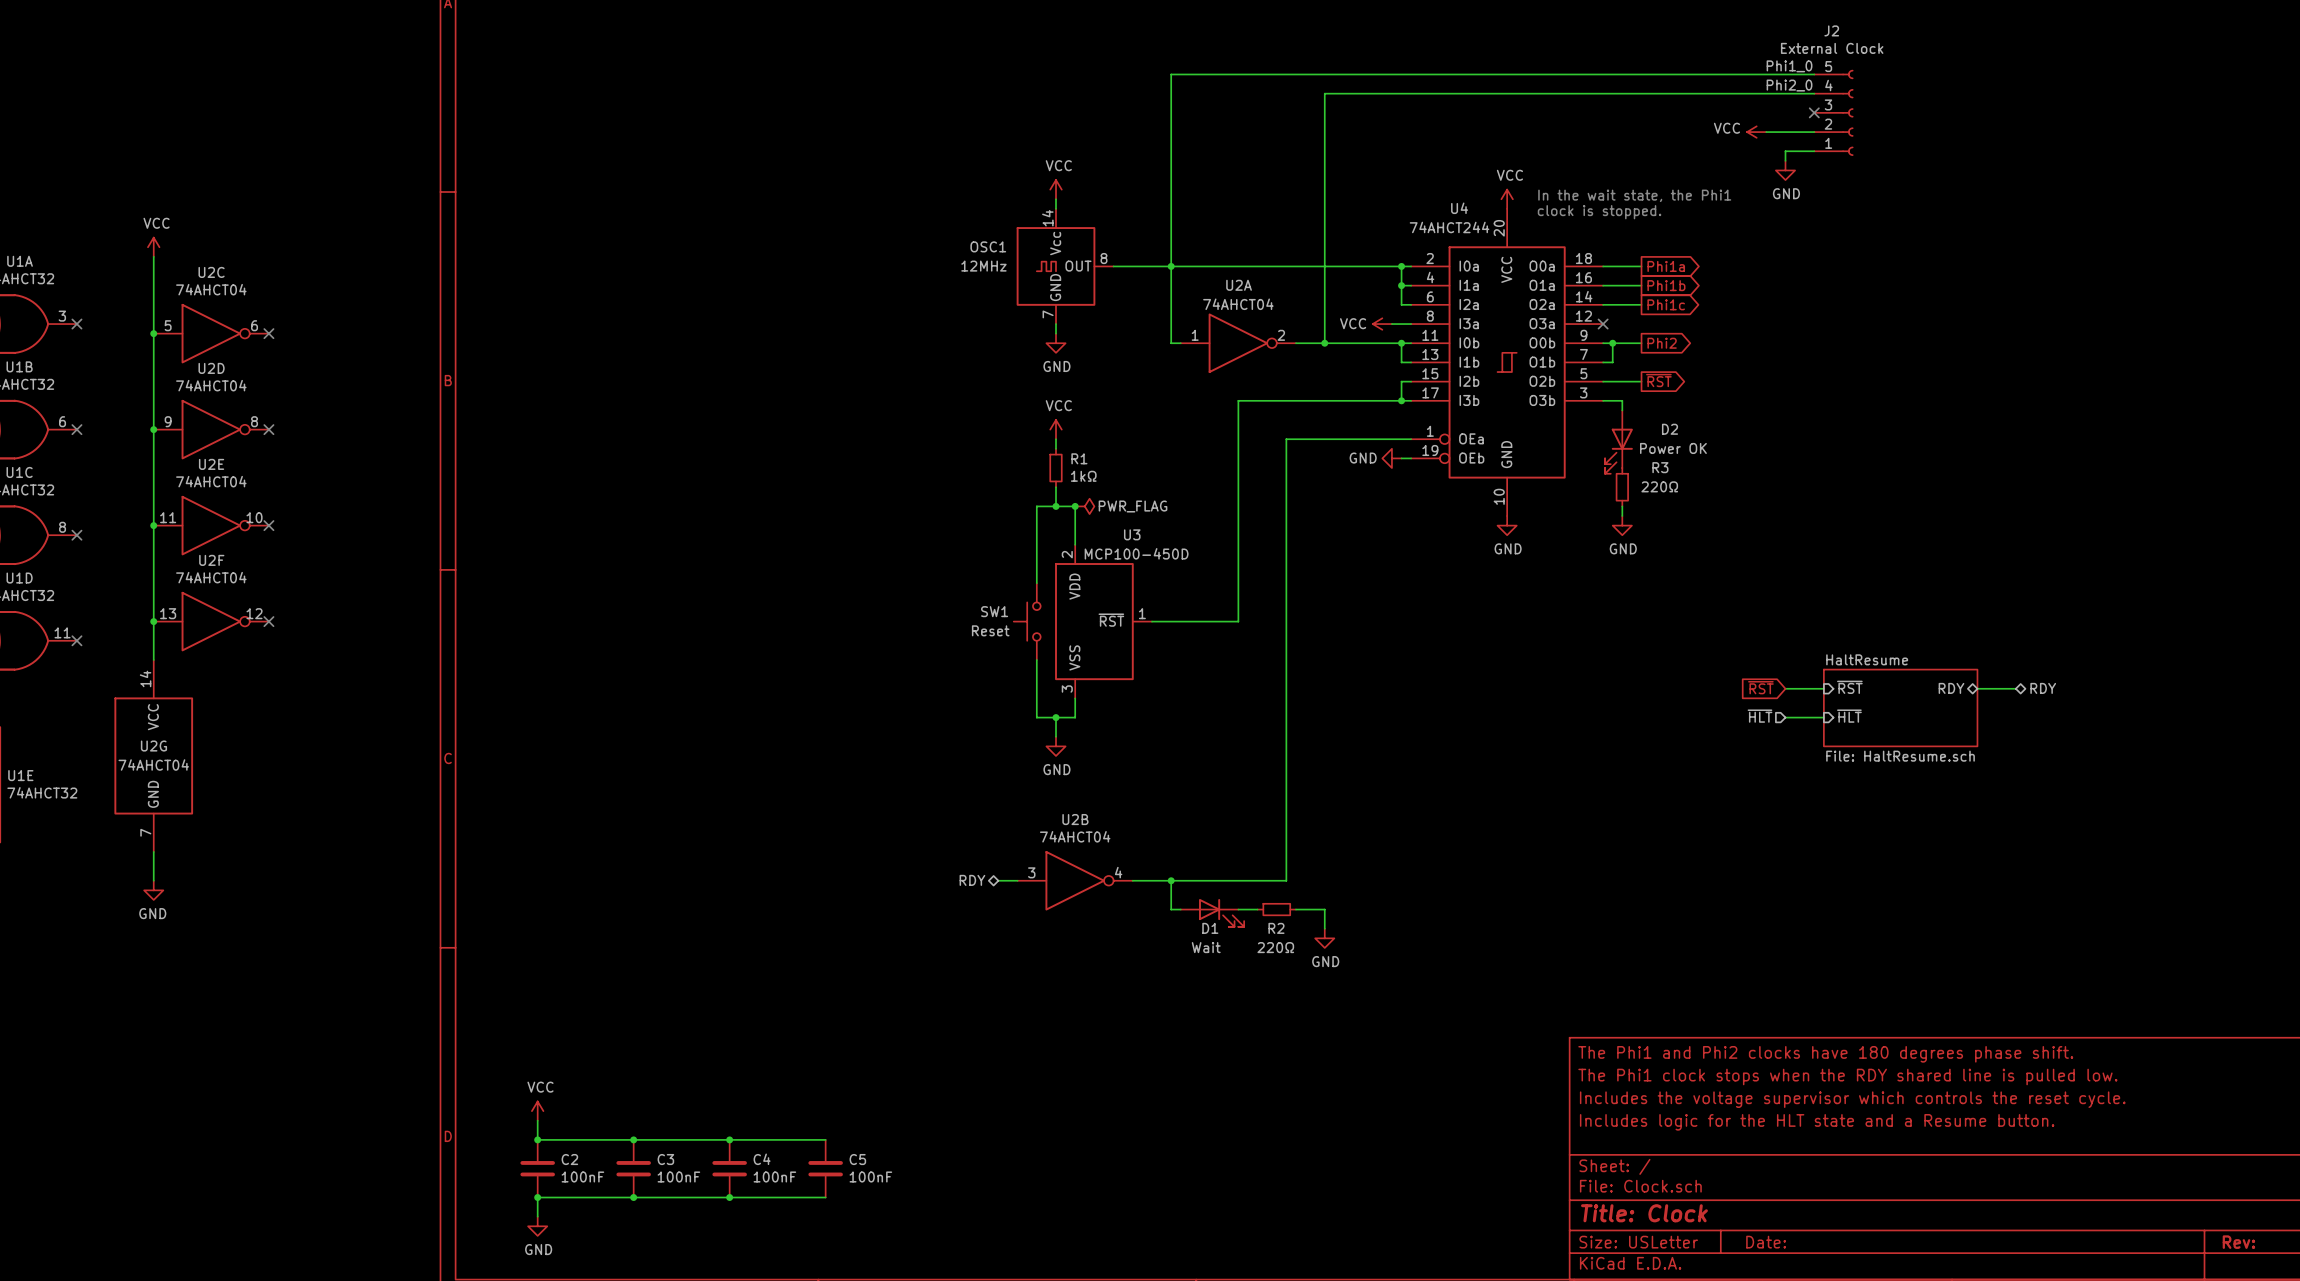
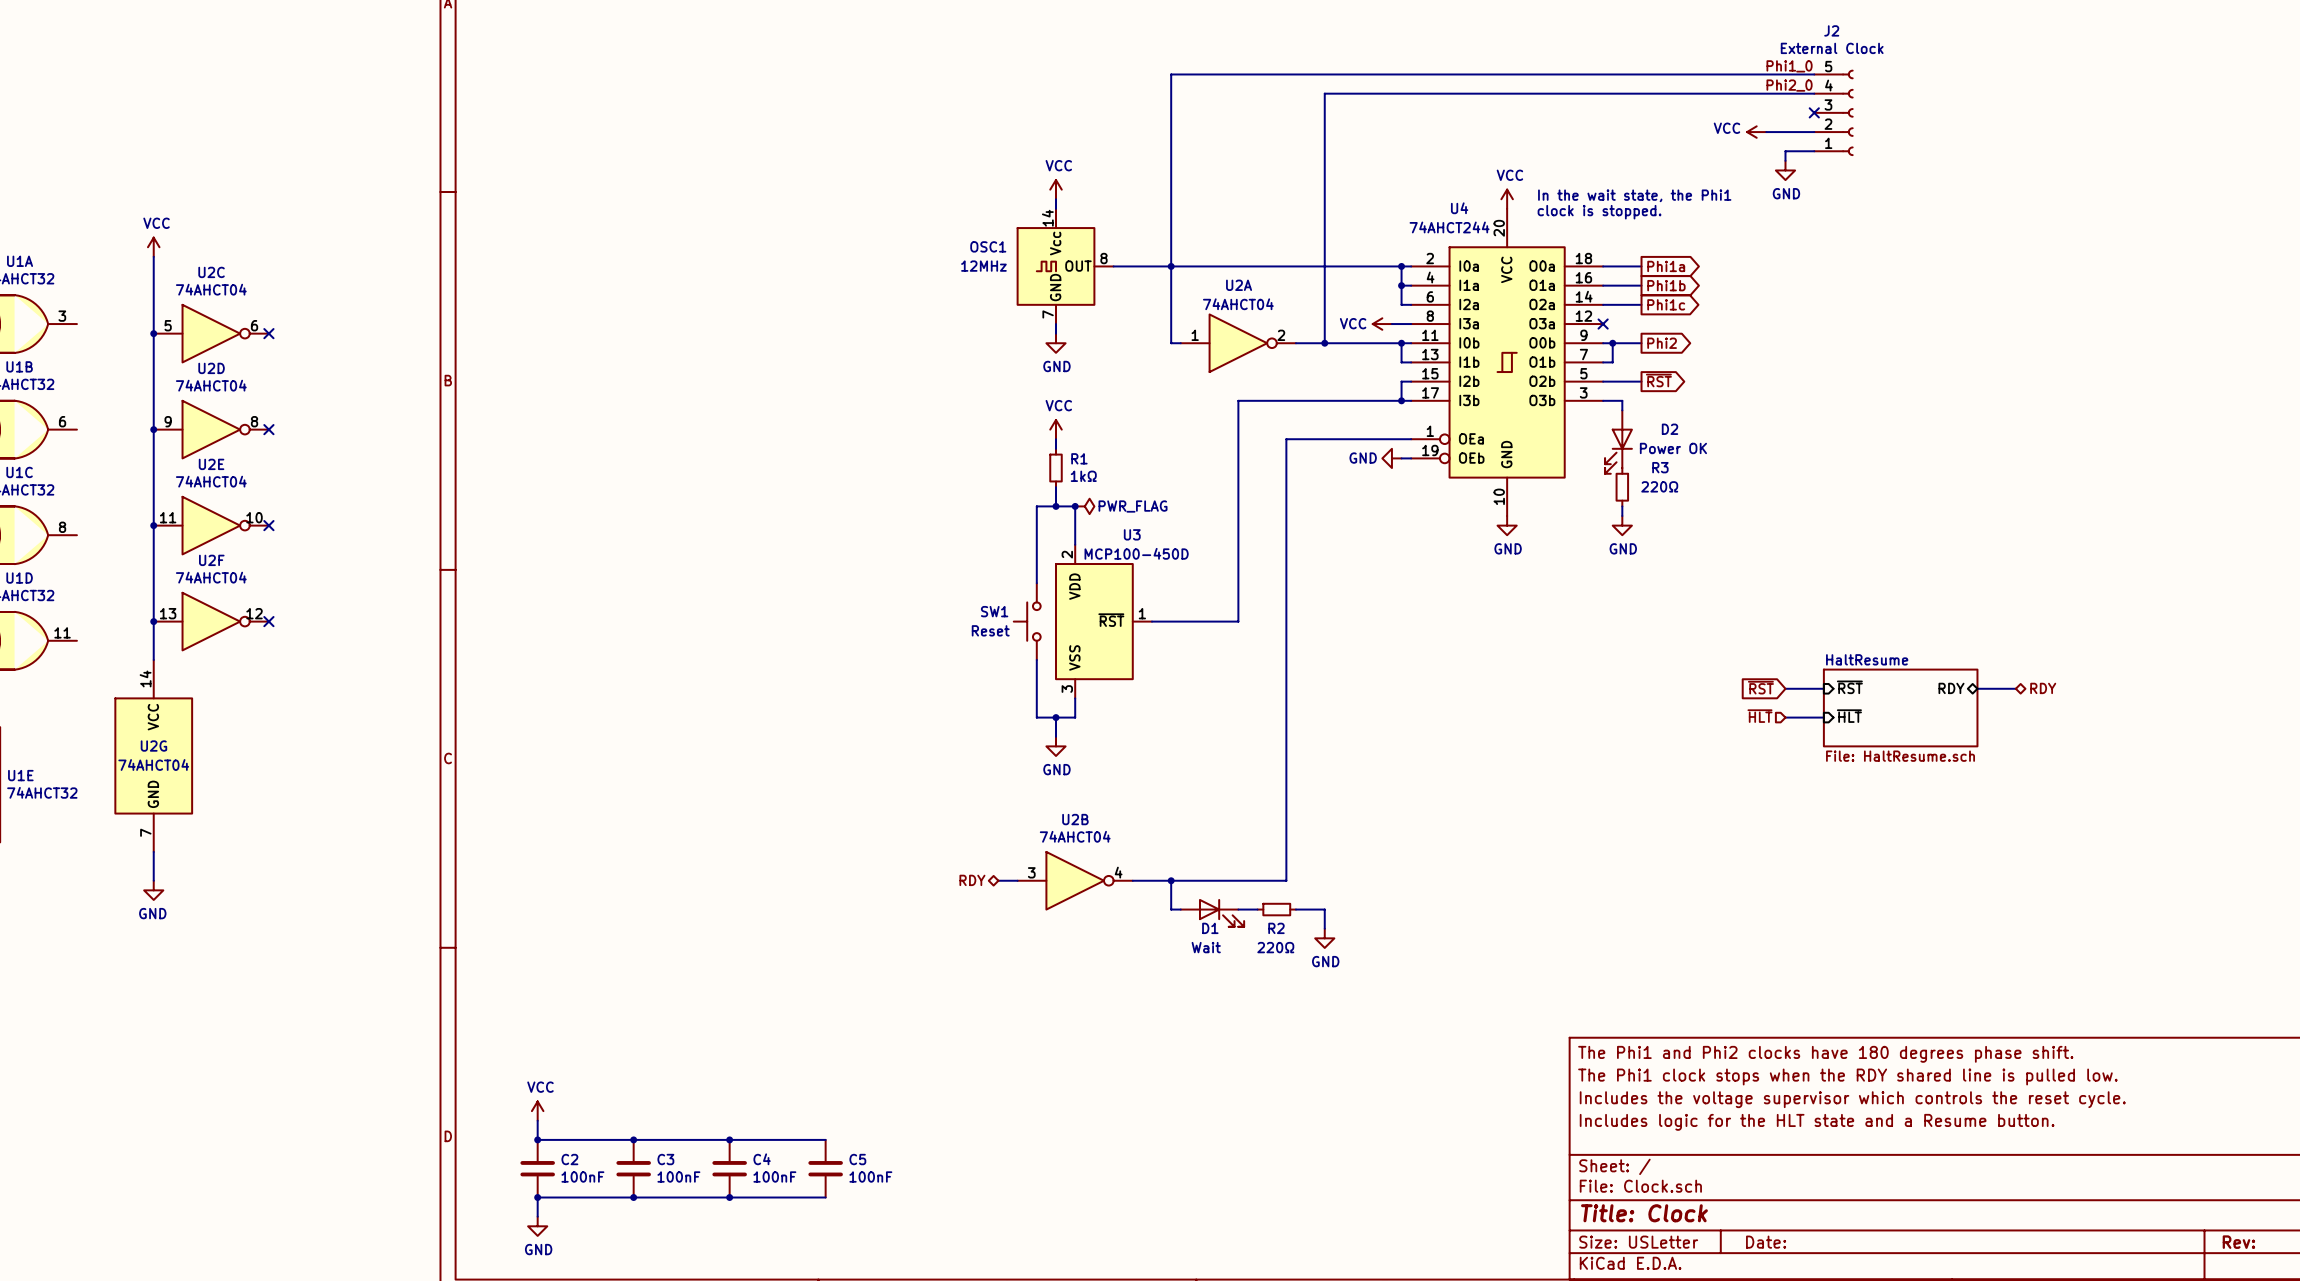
no-connect mark: (76, 324) -> none
no-connect mark: (76, 429) -> none
no-connect mark: (76, 535) -> none
no-connect mark: (76, 640) -> none

